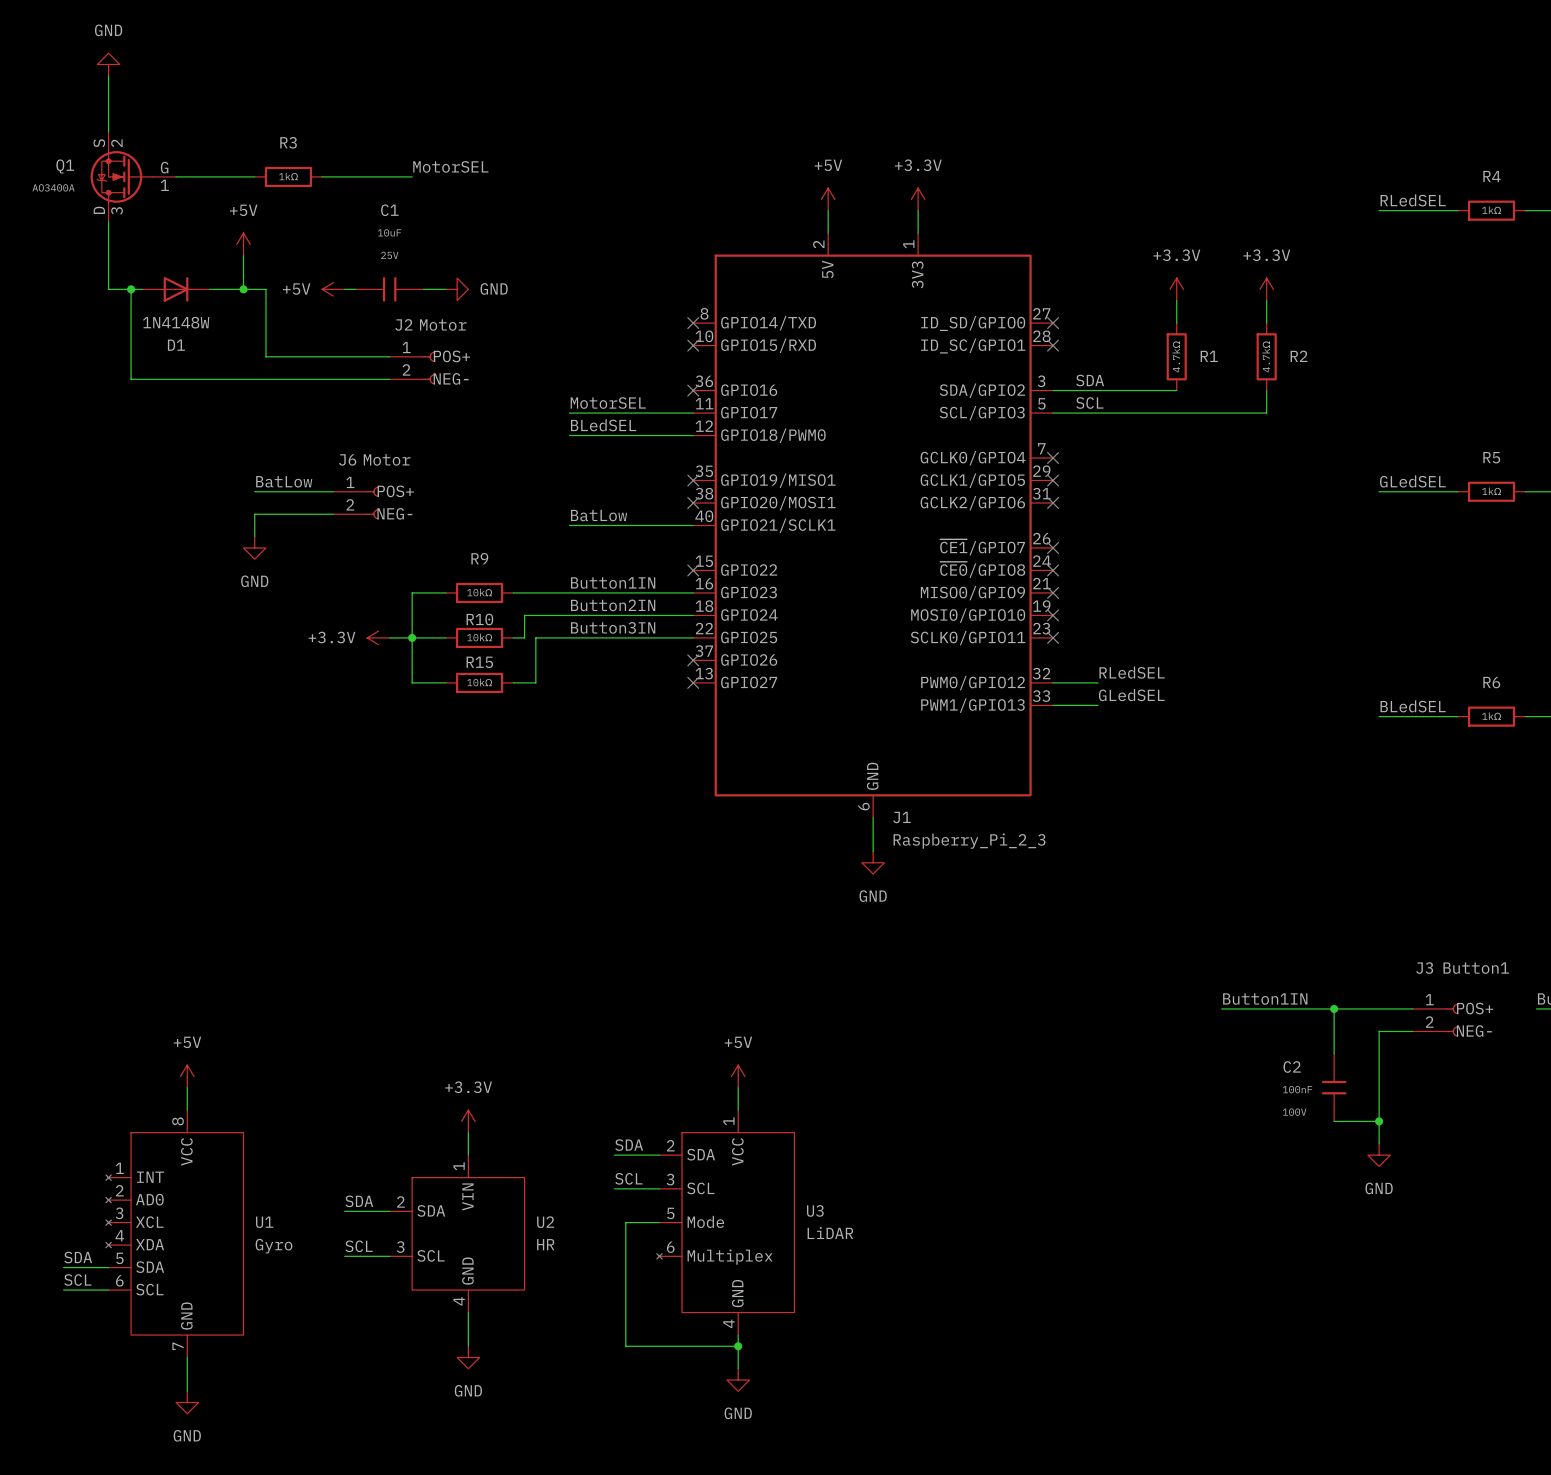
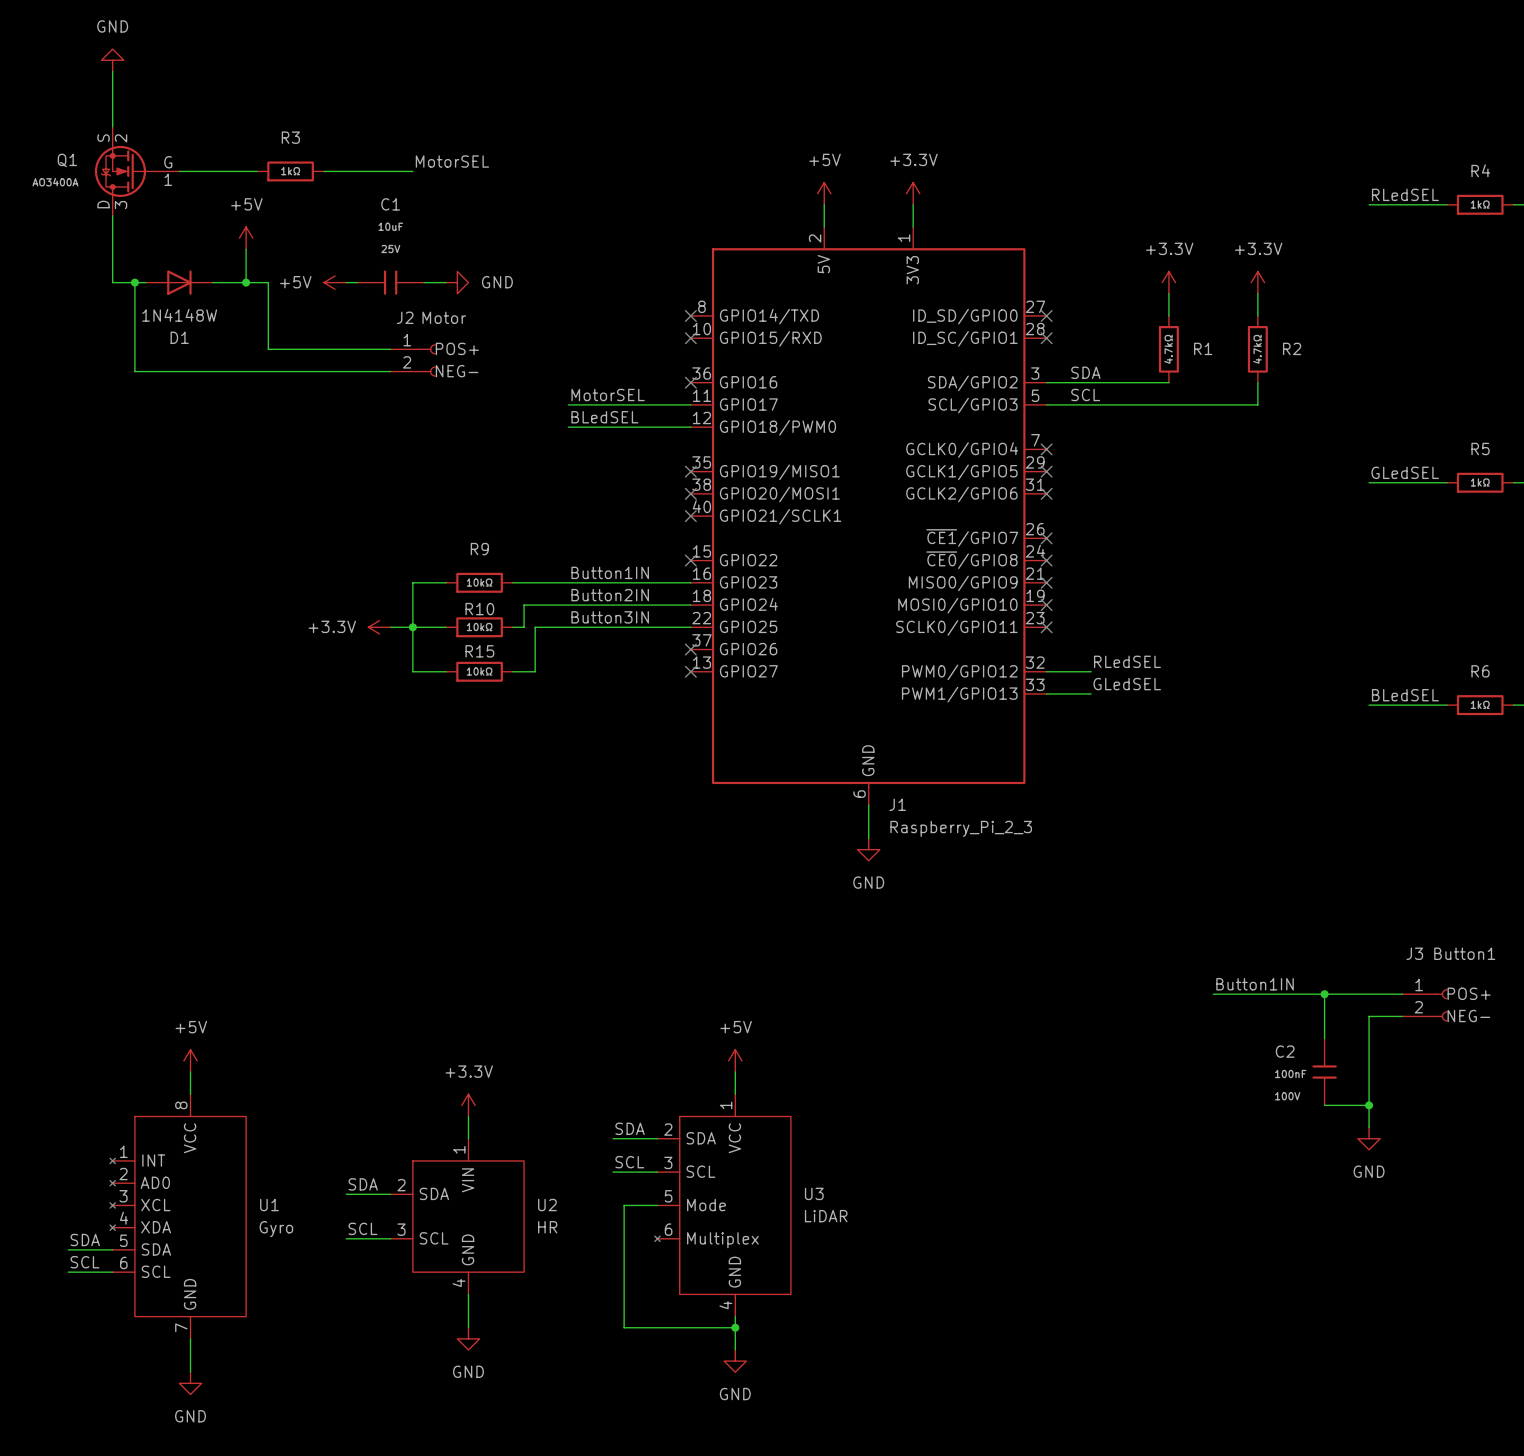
label: BatLow (284, 481) -> none
wire: (254, 491) (333, 491) -> none
J6: Motor (356, 503) -> none
wire: (333, 514) (254, 514) (254, 536) -> none
label: BatLow (599, 515) -> none
wire: (569, 525) (693, 525) -> none
no-connect mark: none -> (690, 516)
power symbol: GND (254, 547) -> none

